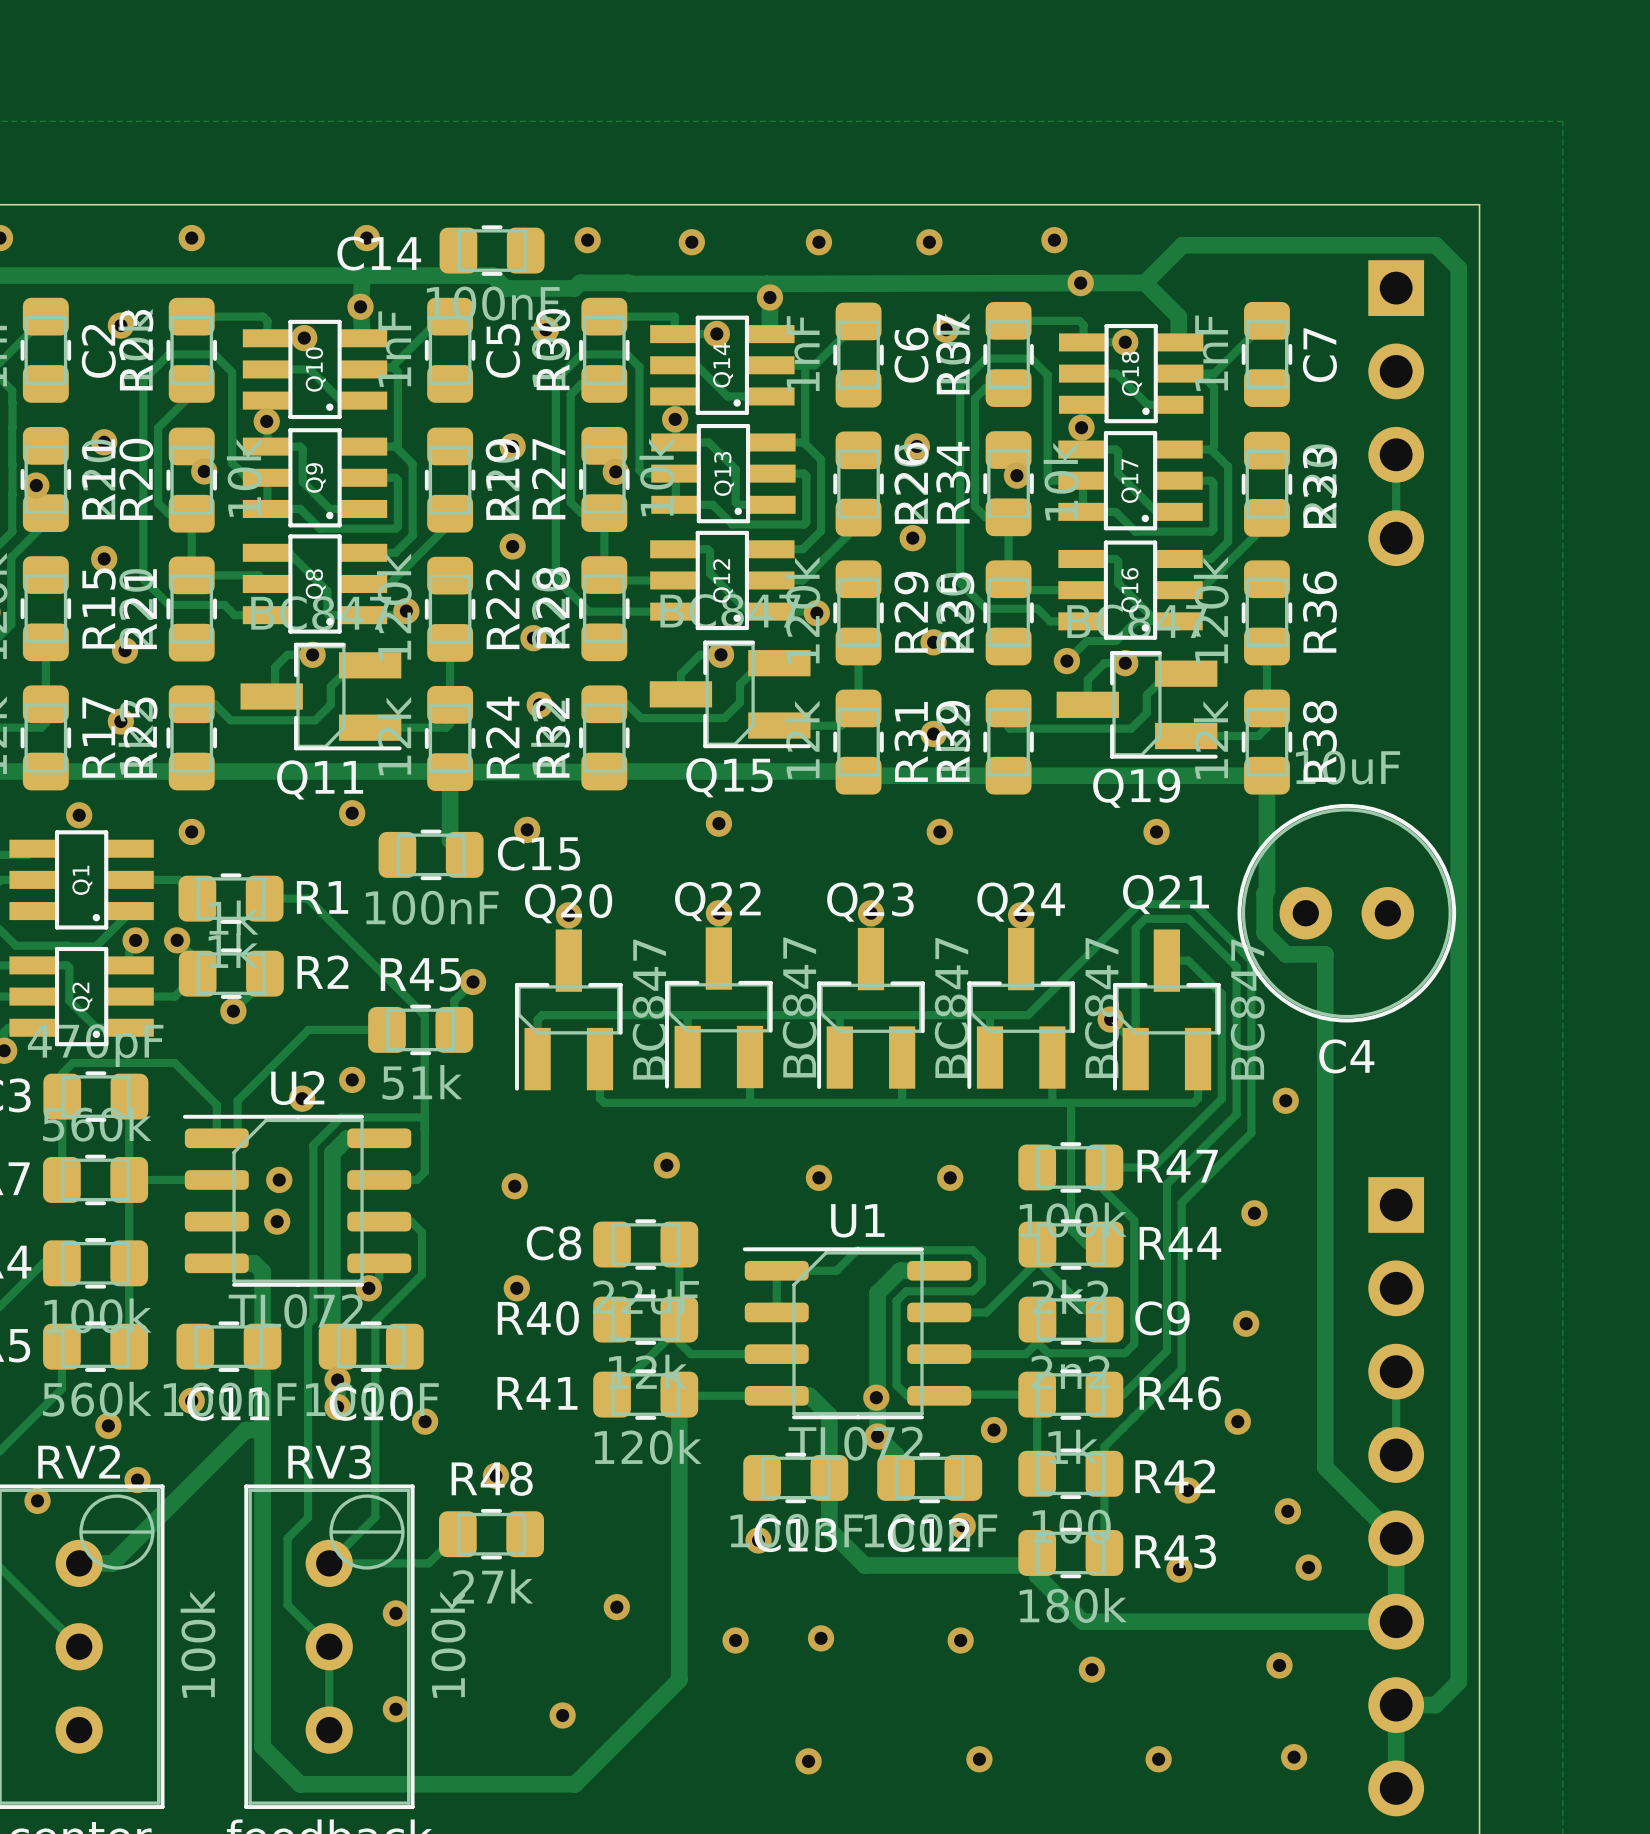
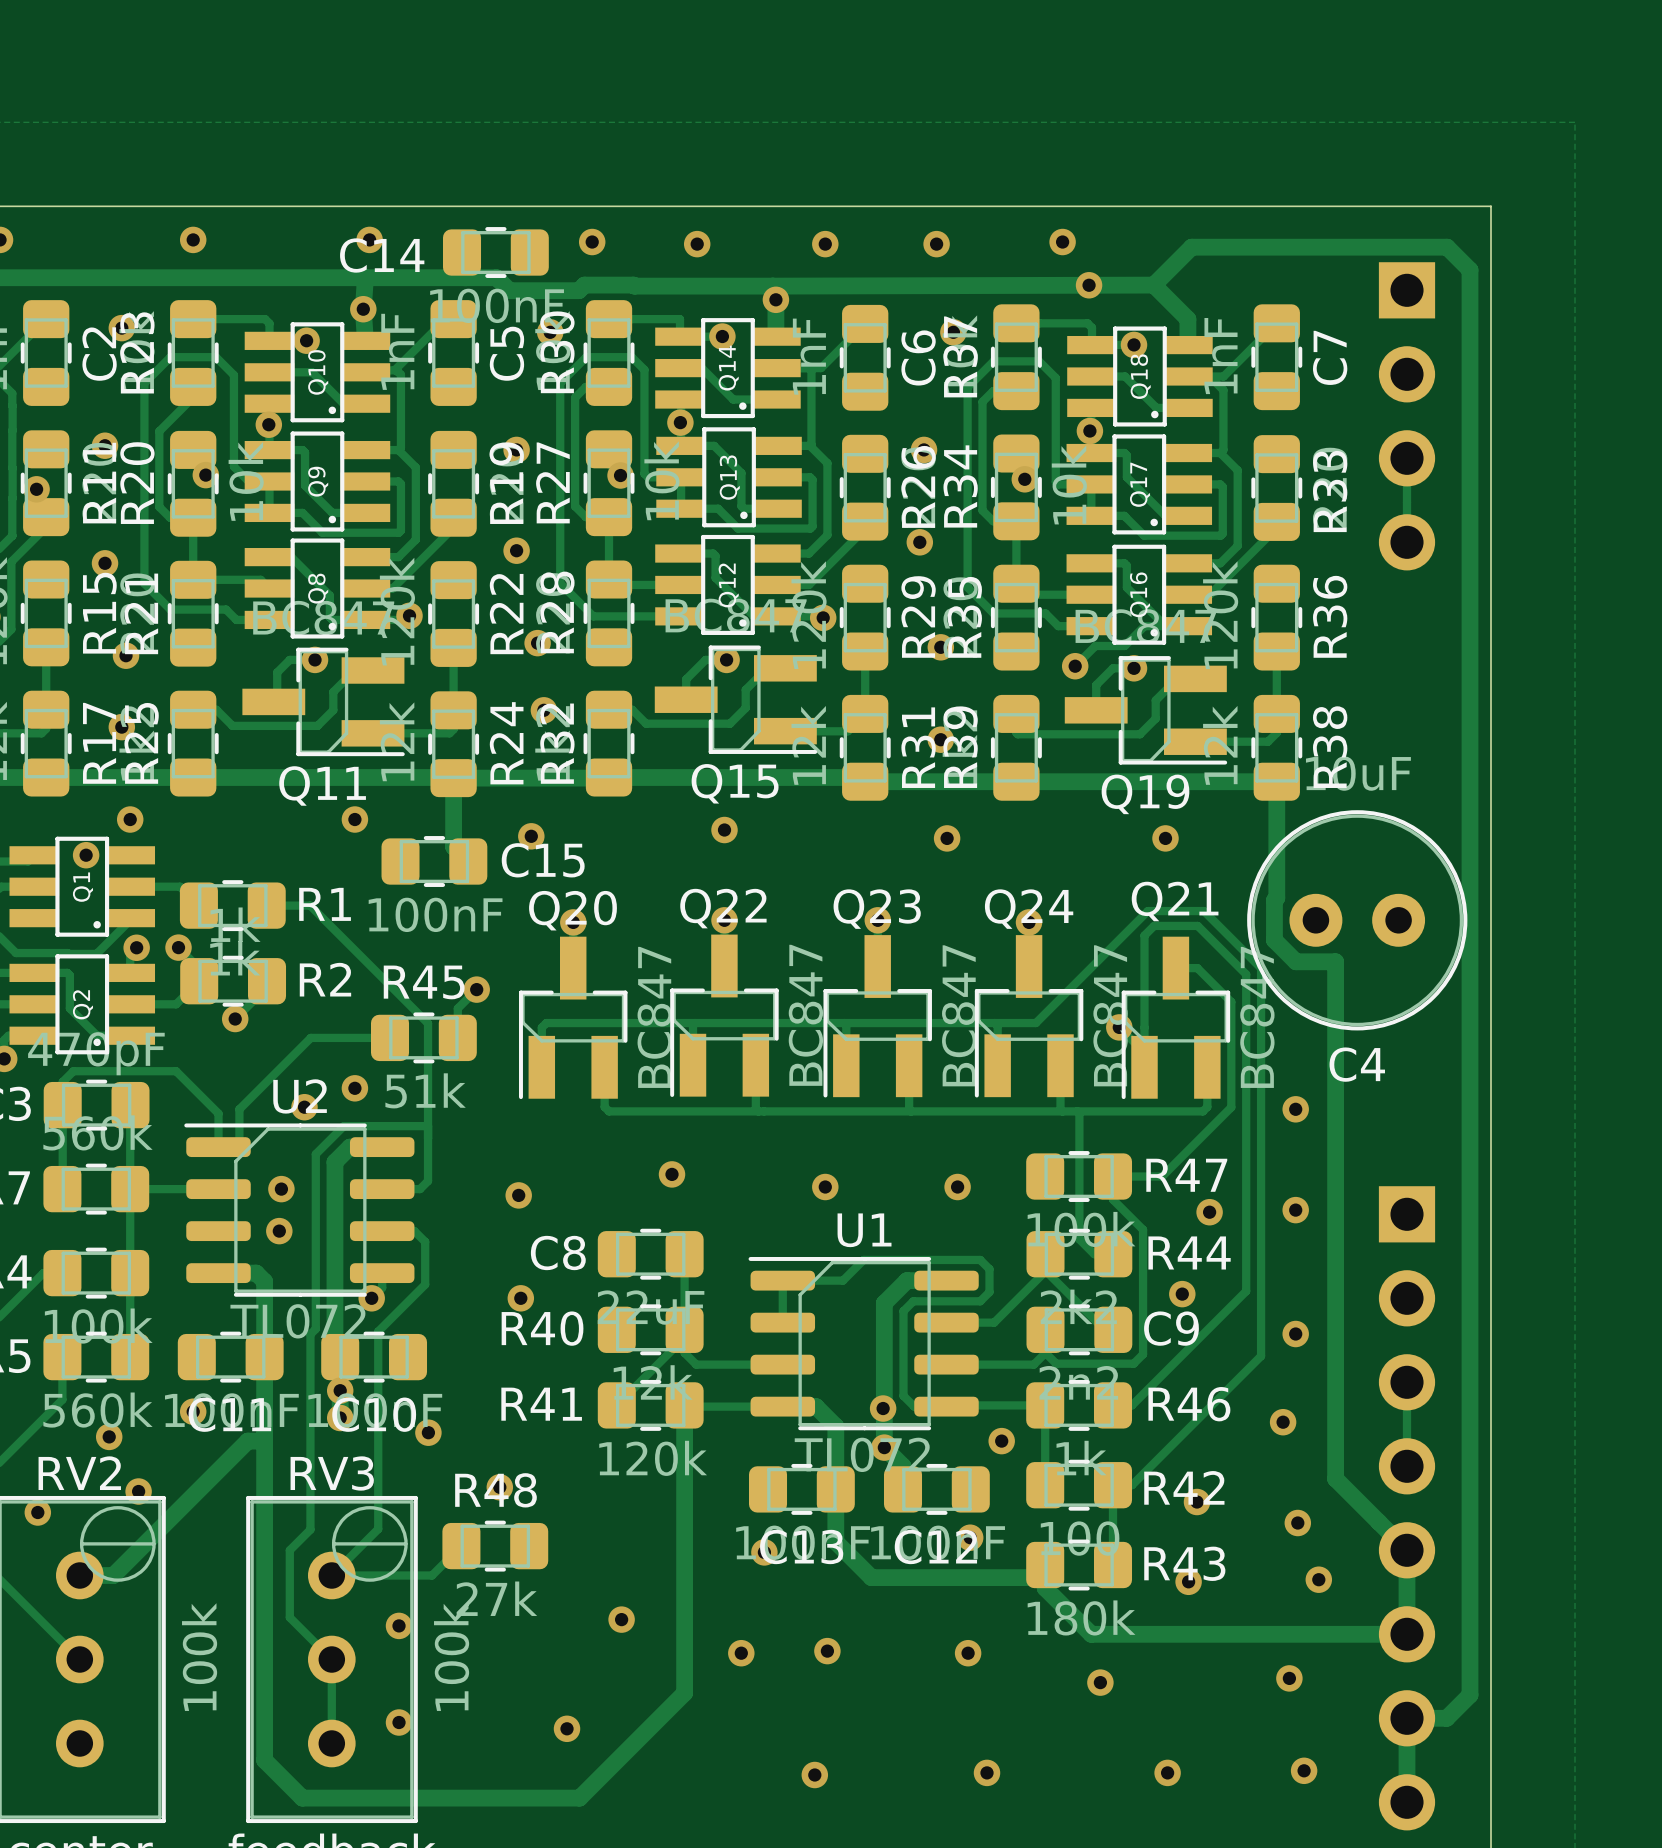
via: none -> (130, 819)
via: (79, 815) -> none
via: (191, 831) -> none
via: none -> (86, 855)
track: (1236, 1114) (1166, 1184) (1166, 1350) -> (1246, 1123) (1246, 1291) (1176, 1361)
track: (1251, 1133) (1181, 1202) (1181, 1369) (1104, 1446) (1104, 1473) -> (1261, 1141) (1261, 1356) (1132, 1485) (1113, 1485)
via: none -> (1295, 1210)
via: none -> (1209, 1212)
via: (1254, 1213) -> none
via: none -> (1182, 1294)
via position: (1246, 1323) -> (1295, 1334)
via position: (1237, 1421) -> (1283, 1422)

